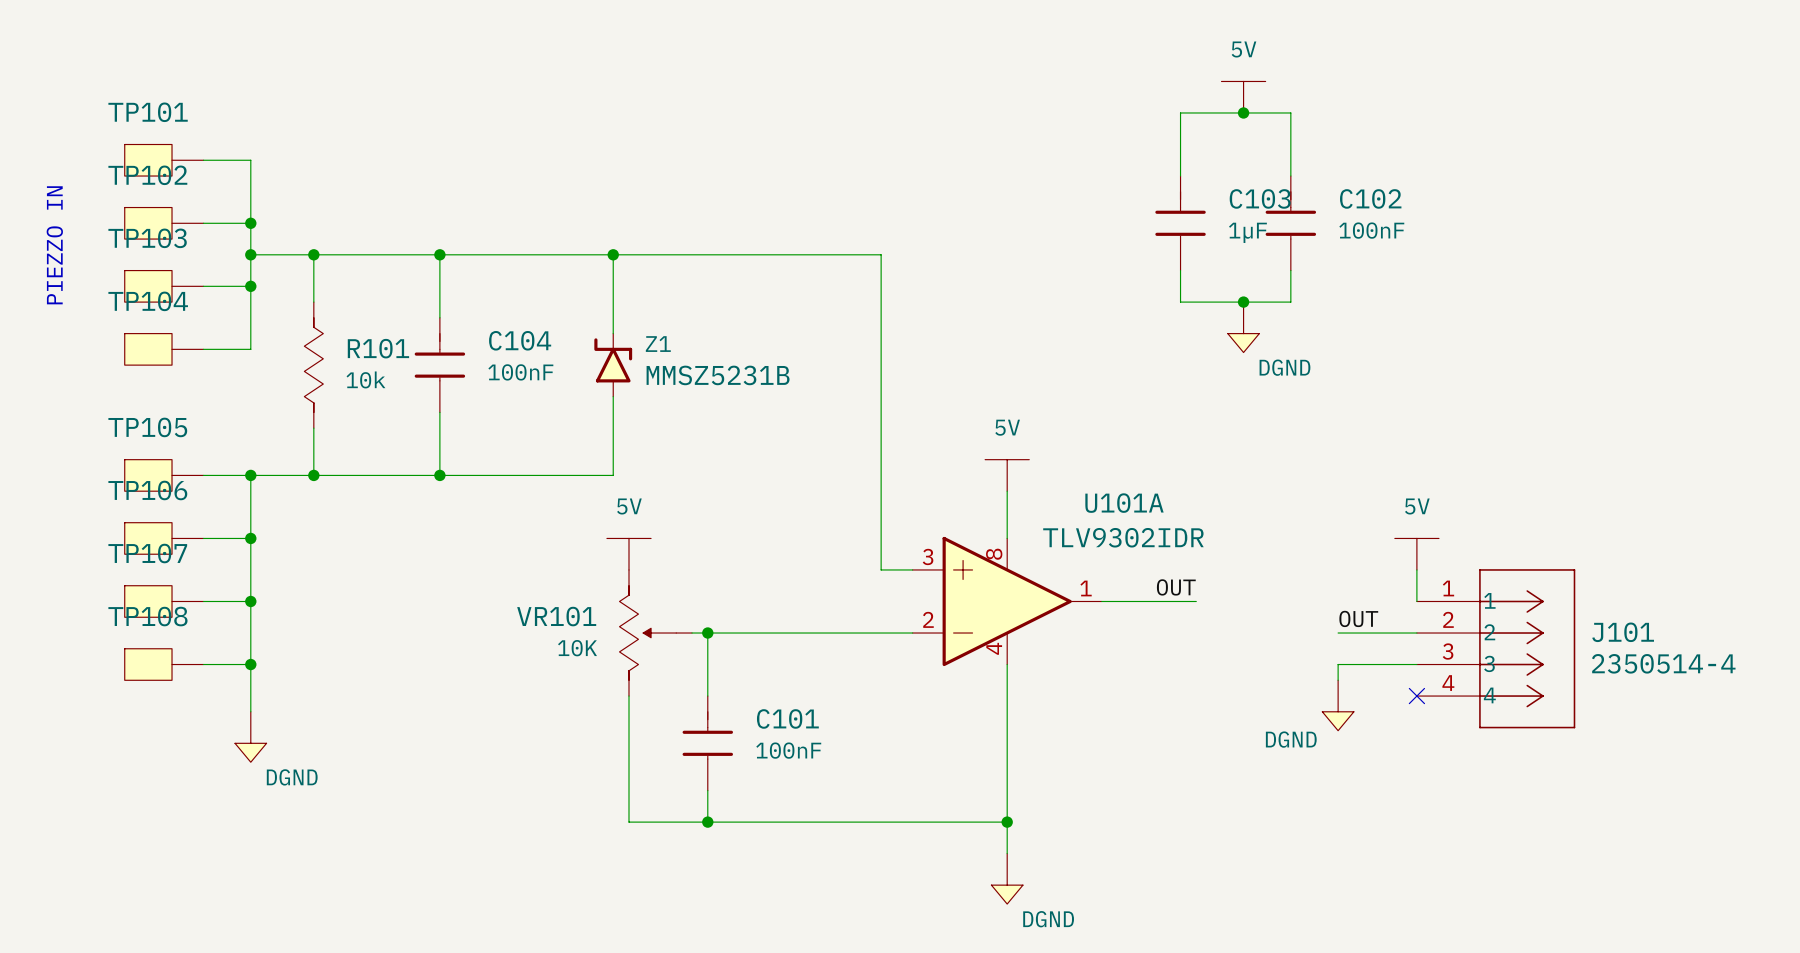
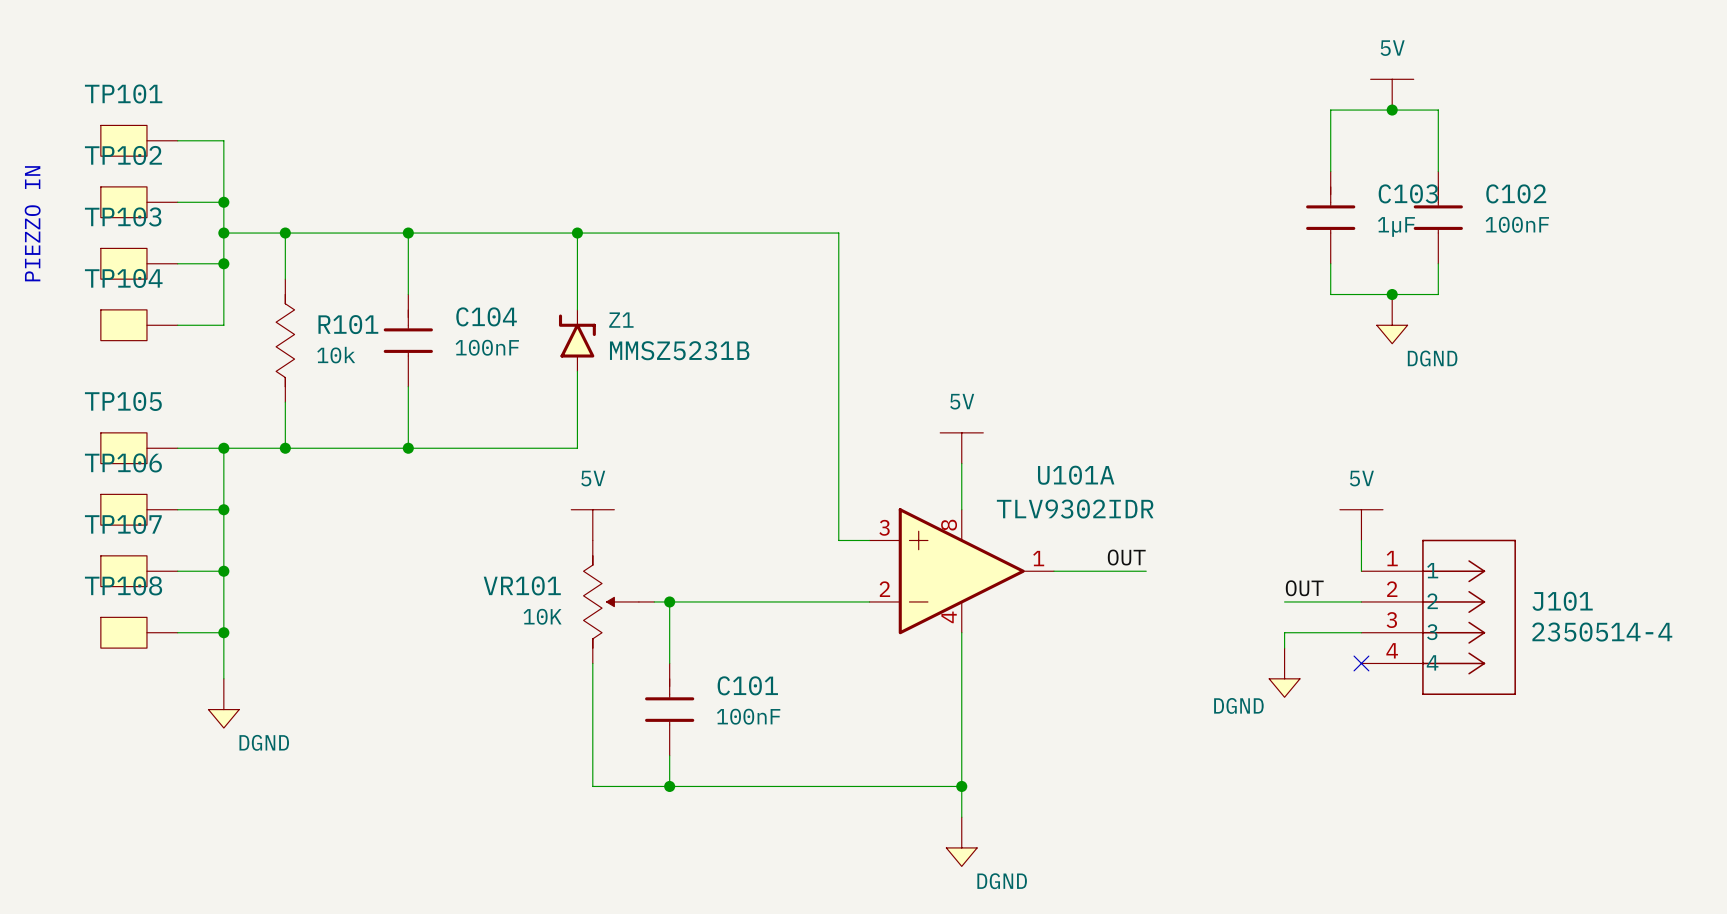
power symbol position: 5V (1243, 97) -> 5V (1392, 94)
junction: (1243, 112) -> none
junction: none -> (1392, 110)
wire: (1180, 176) (1180, 112) (1290, 112) (1290, 176) -> (1330, 171) (1330, 110) (1438, 110) (1438, 171)
C103 position: (1180, 223) -> (1330, 217)
C102 position: (1290, 223) -> (1438, 217)
wire: (1180, 270) (1180, 302) (1290, 302) (1290, 270) -> (1330, 263) (1330, 294) (1438, 294) (1438, 263)
junction: (1243, 302) -> none
junction: none -> (1392, 294)
power symbol position: DGND (1243, 327) -> DGND (1392, 319)

